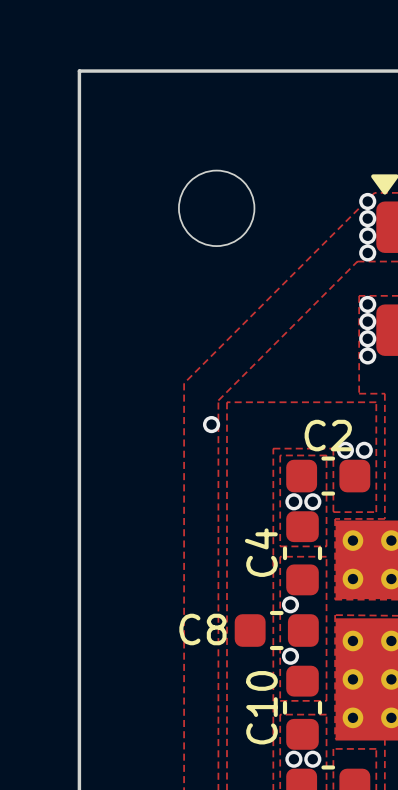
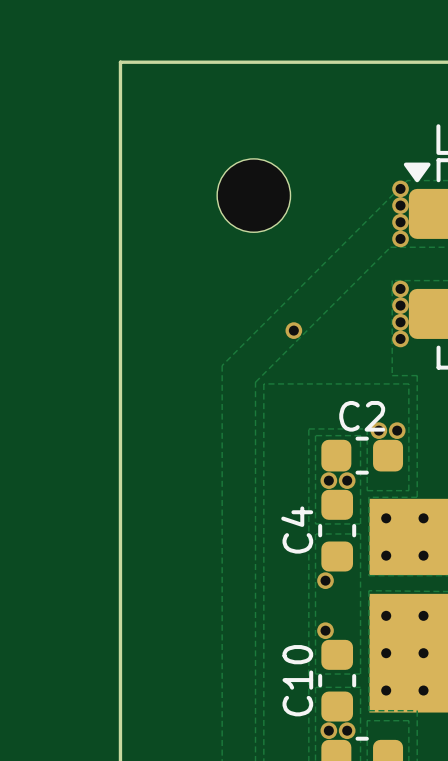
via position: (211, 424) -> (293, 330)
C8: (276, 630) -> none

